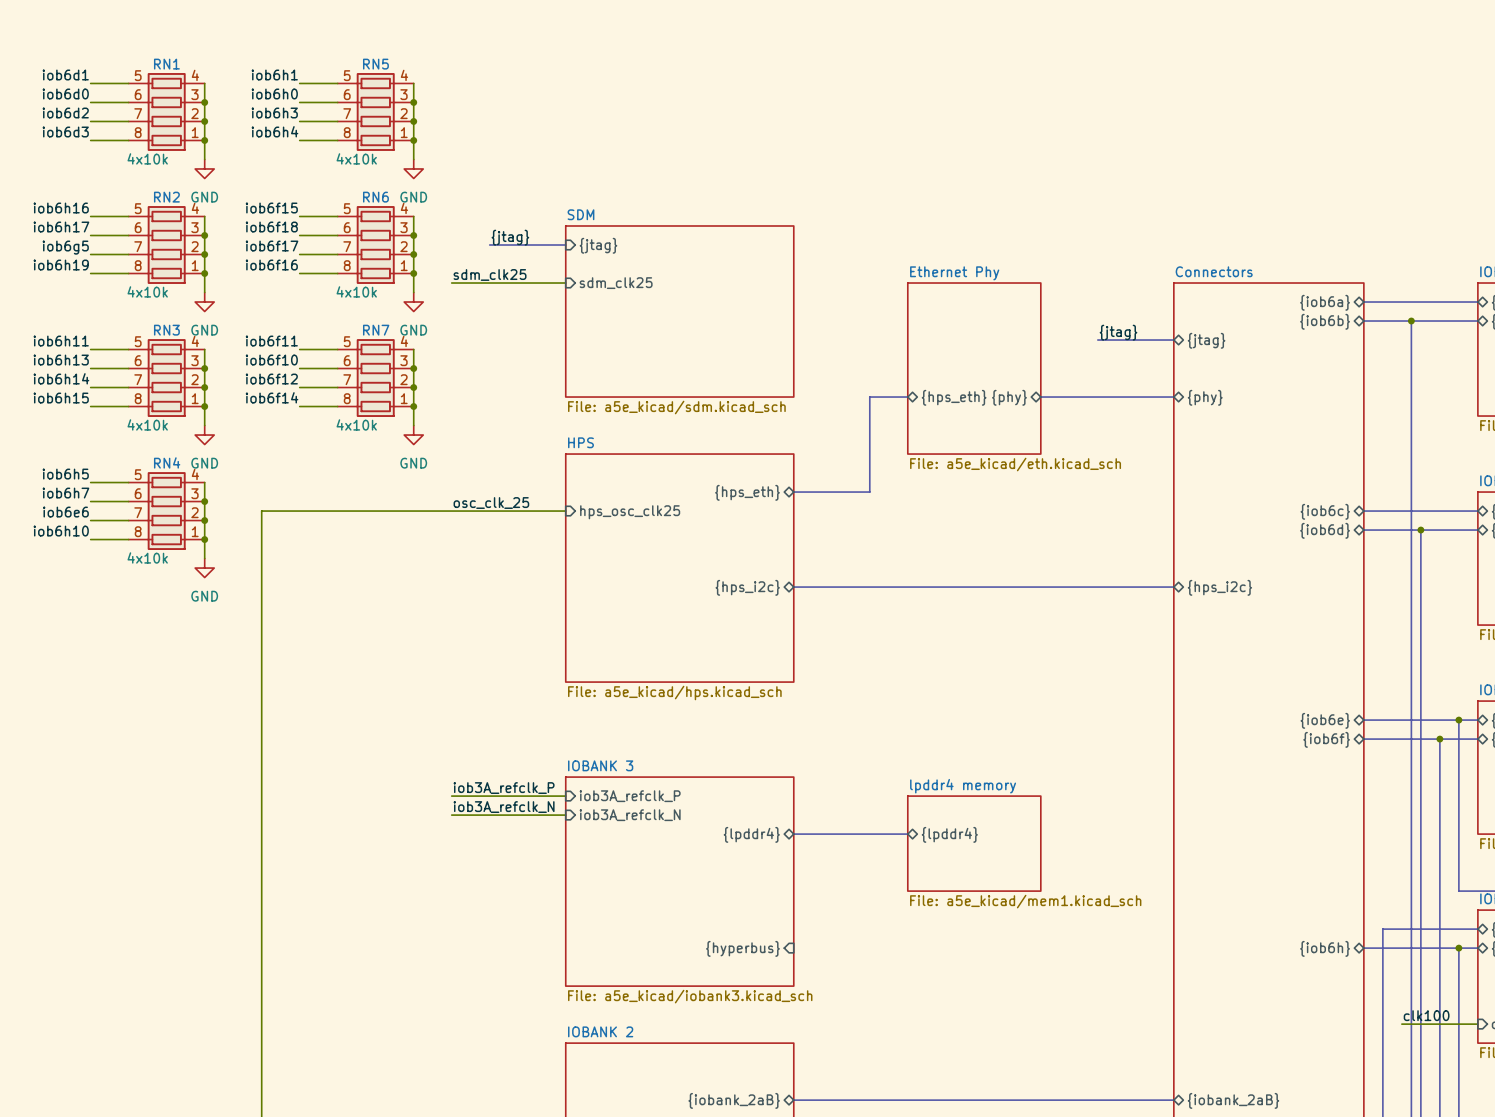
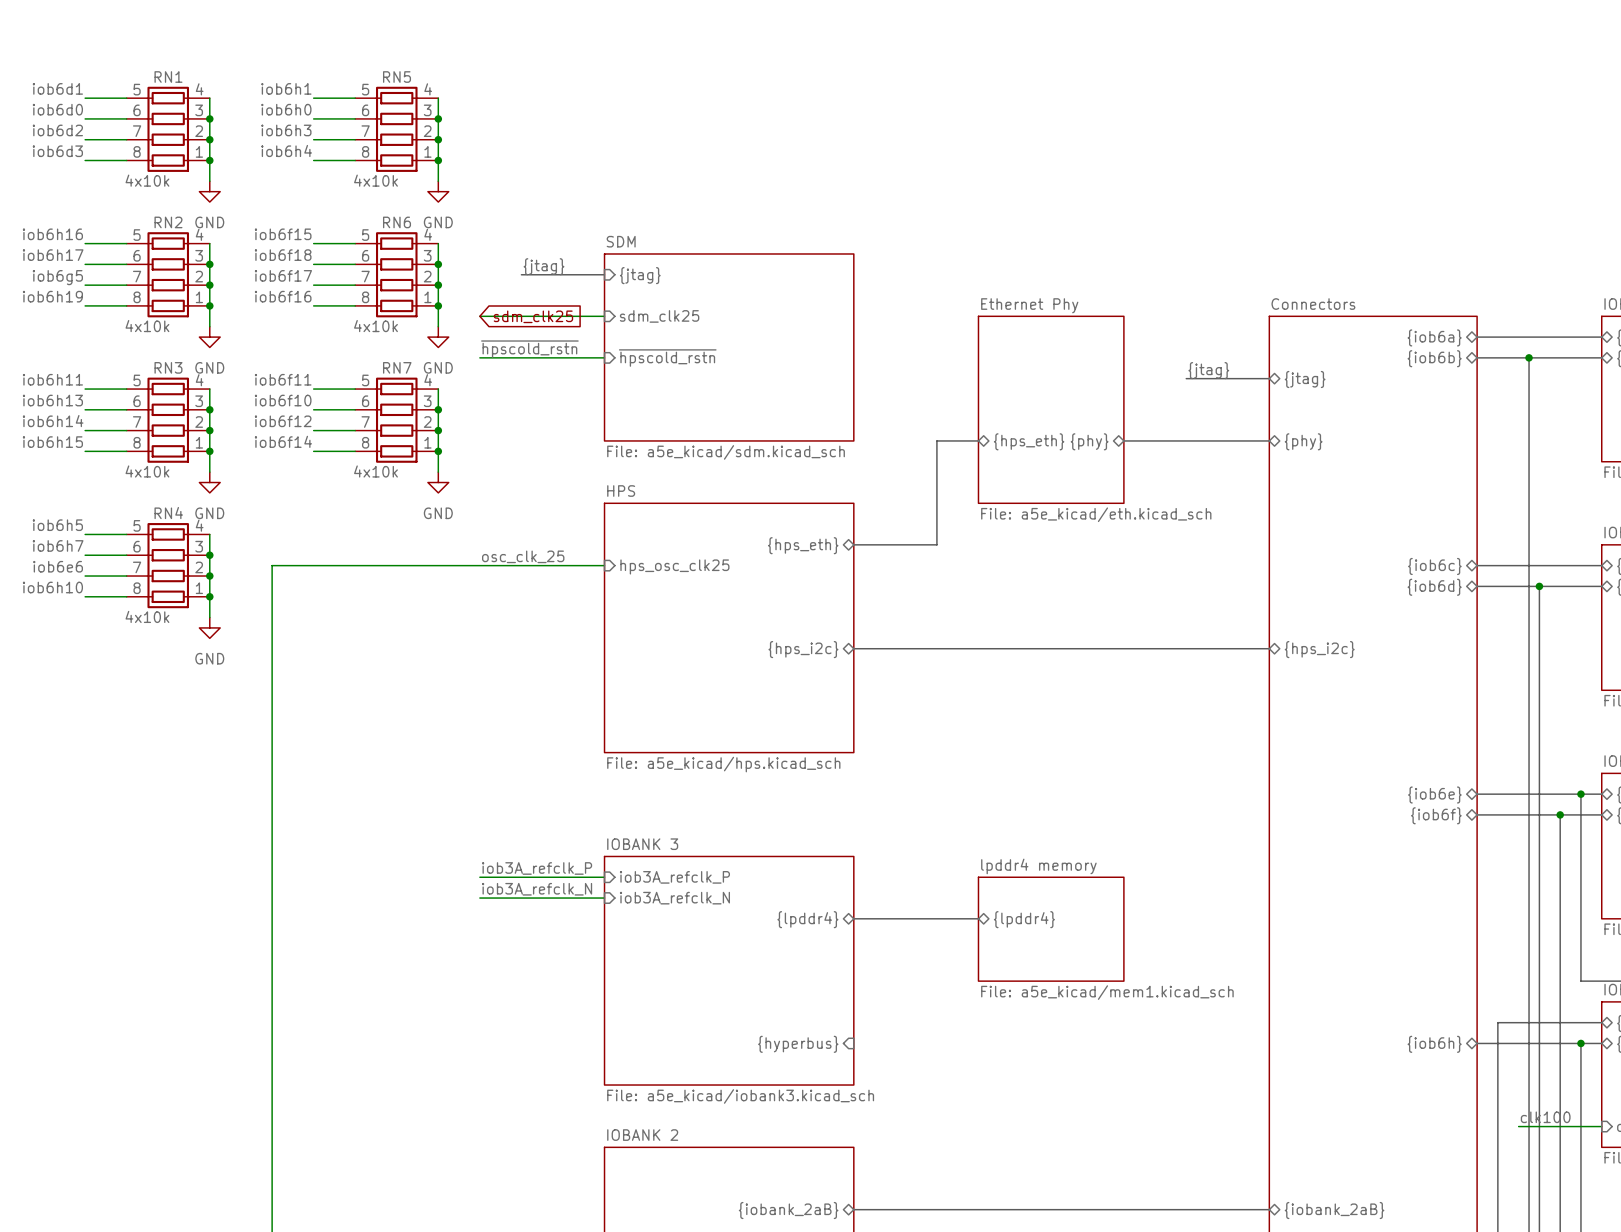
label: sdm_clk25 (490, 274) -> none
global label: none -> sdm_clk25 (533, 316)
label: none -> ~{hpscold_rstn} (529, 349)
wire: none -> (479, 357) (604, 357)
sheet pin: none -> ~{hpscold_rstn} (667, 358)

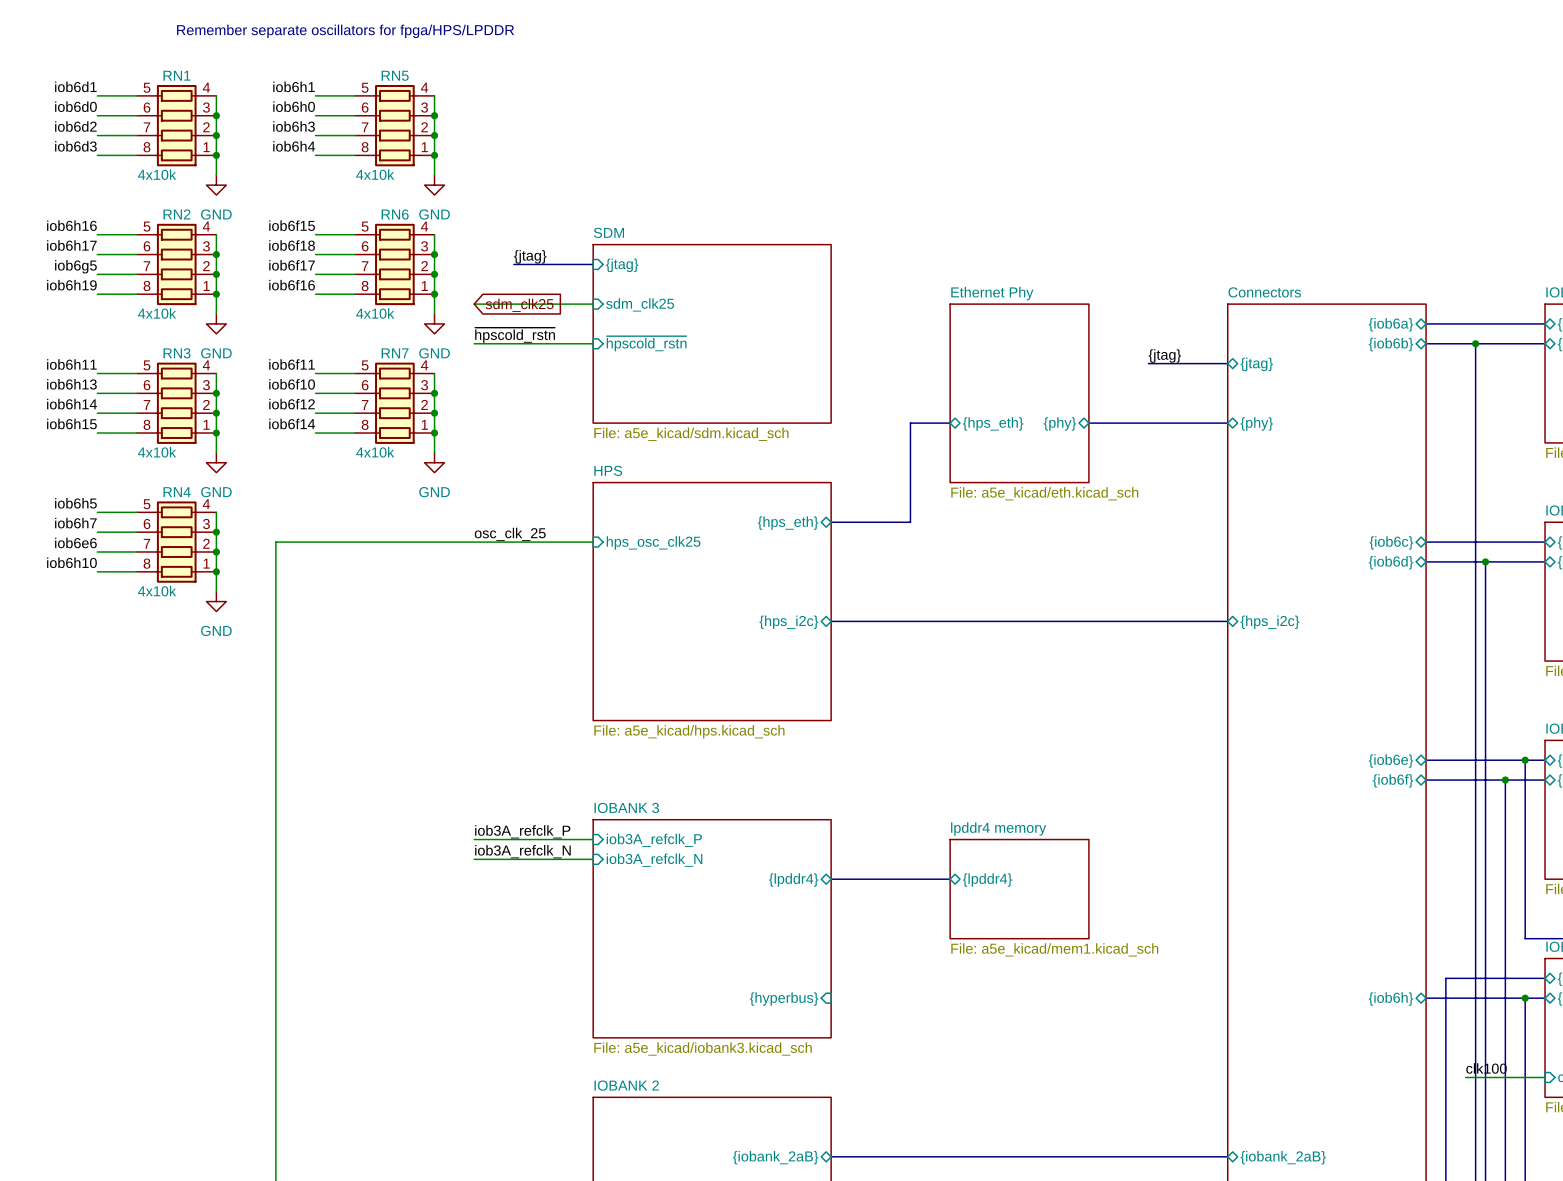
text: none -> Remember separate oscillators for fpga/HPS/LPDDR (345, 31)

